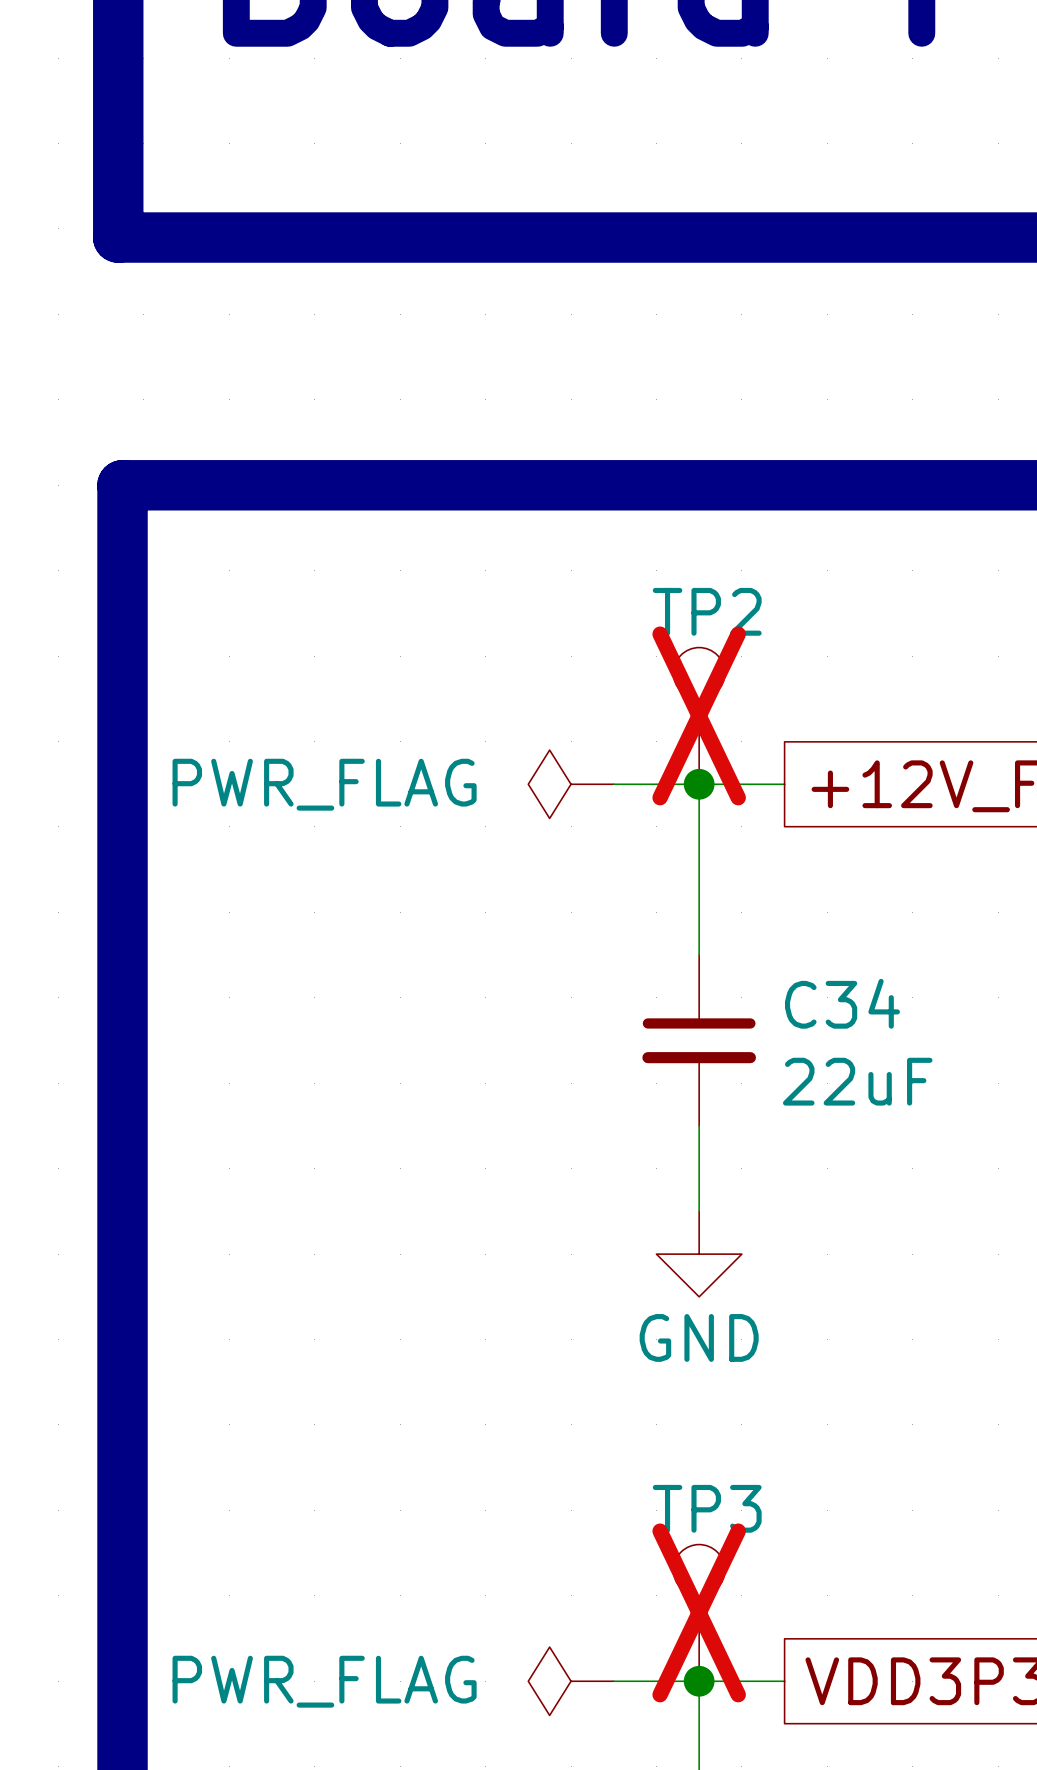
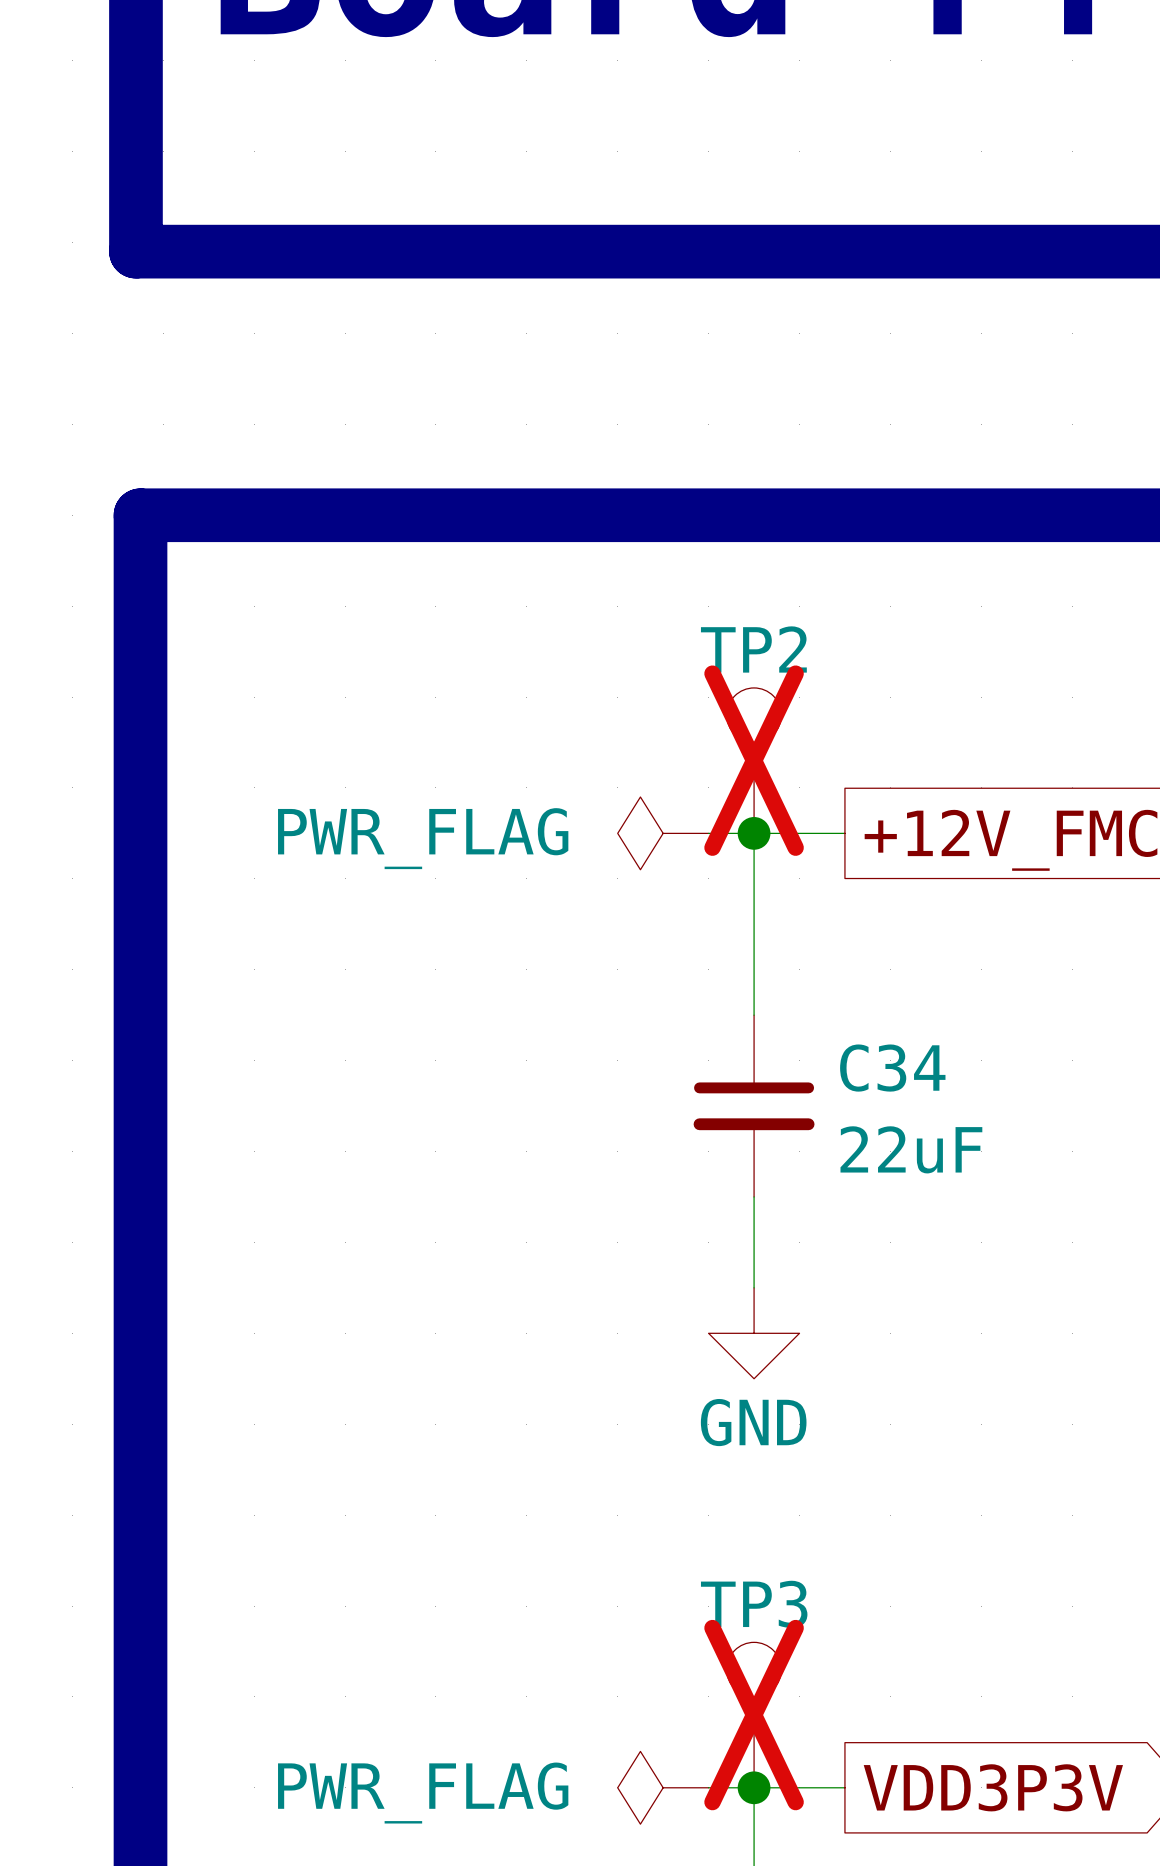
power symbol position: PWR_FLAG (571, 784) -> PWR_FLAG (663, 833)
power symbol position: PWR_FLAG (571, 1681) -> PWR_FLAG (663, 1787)

